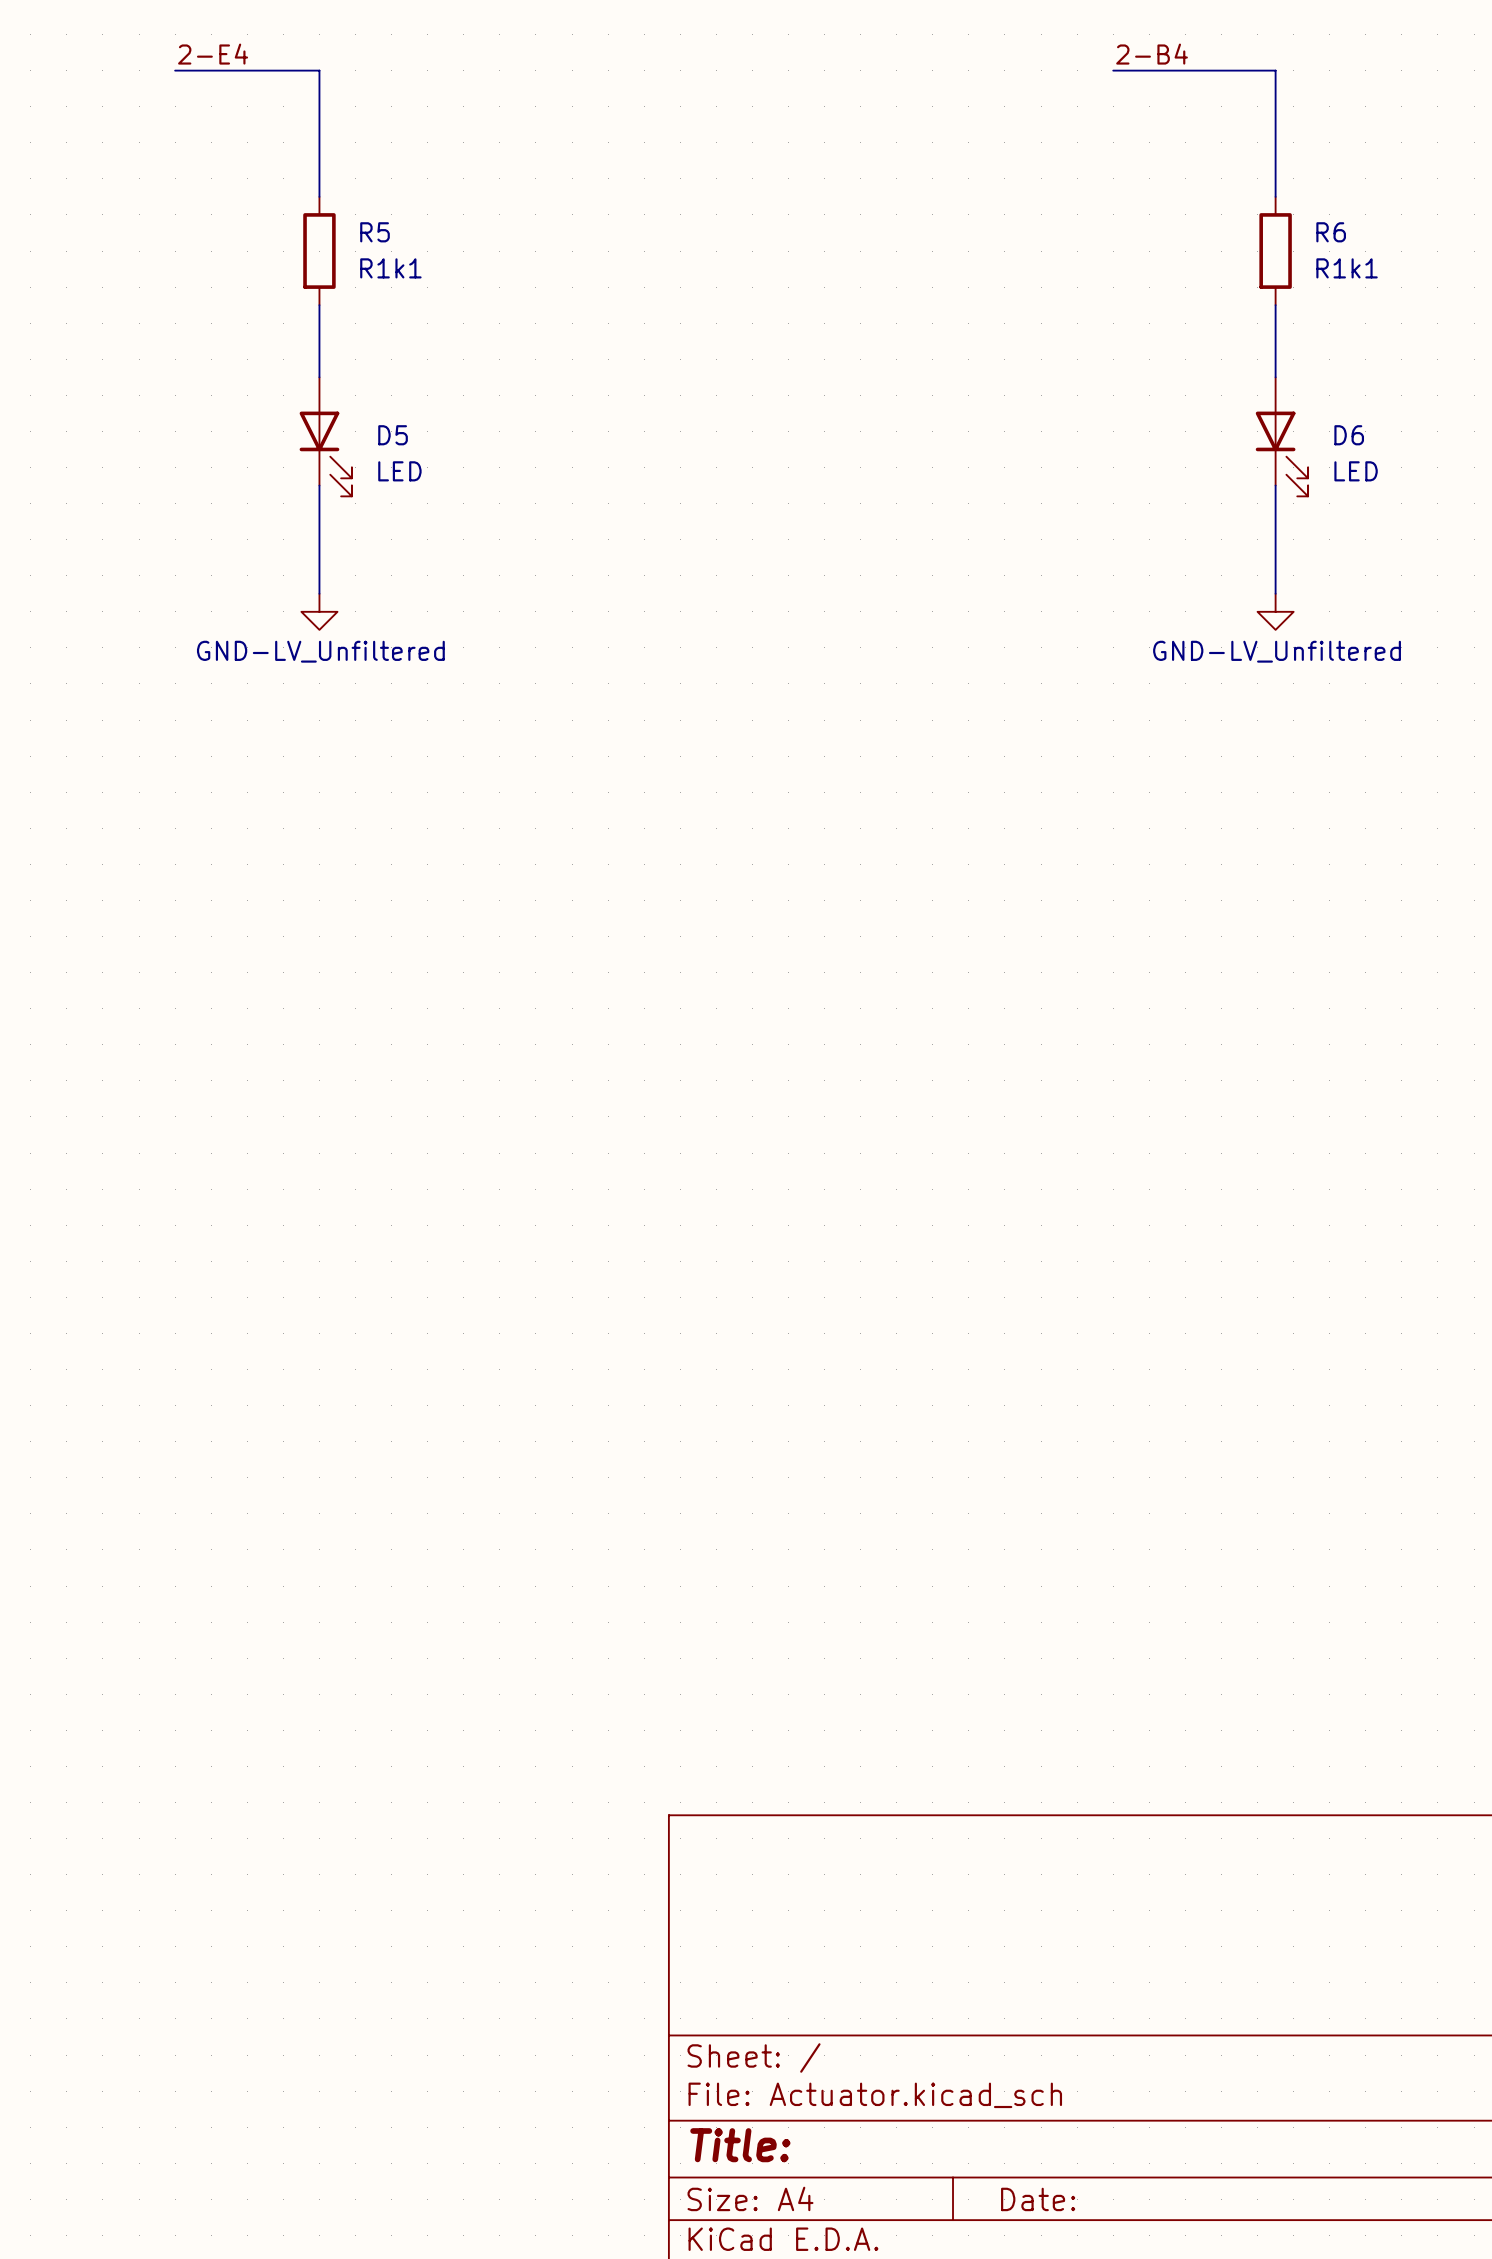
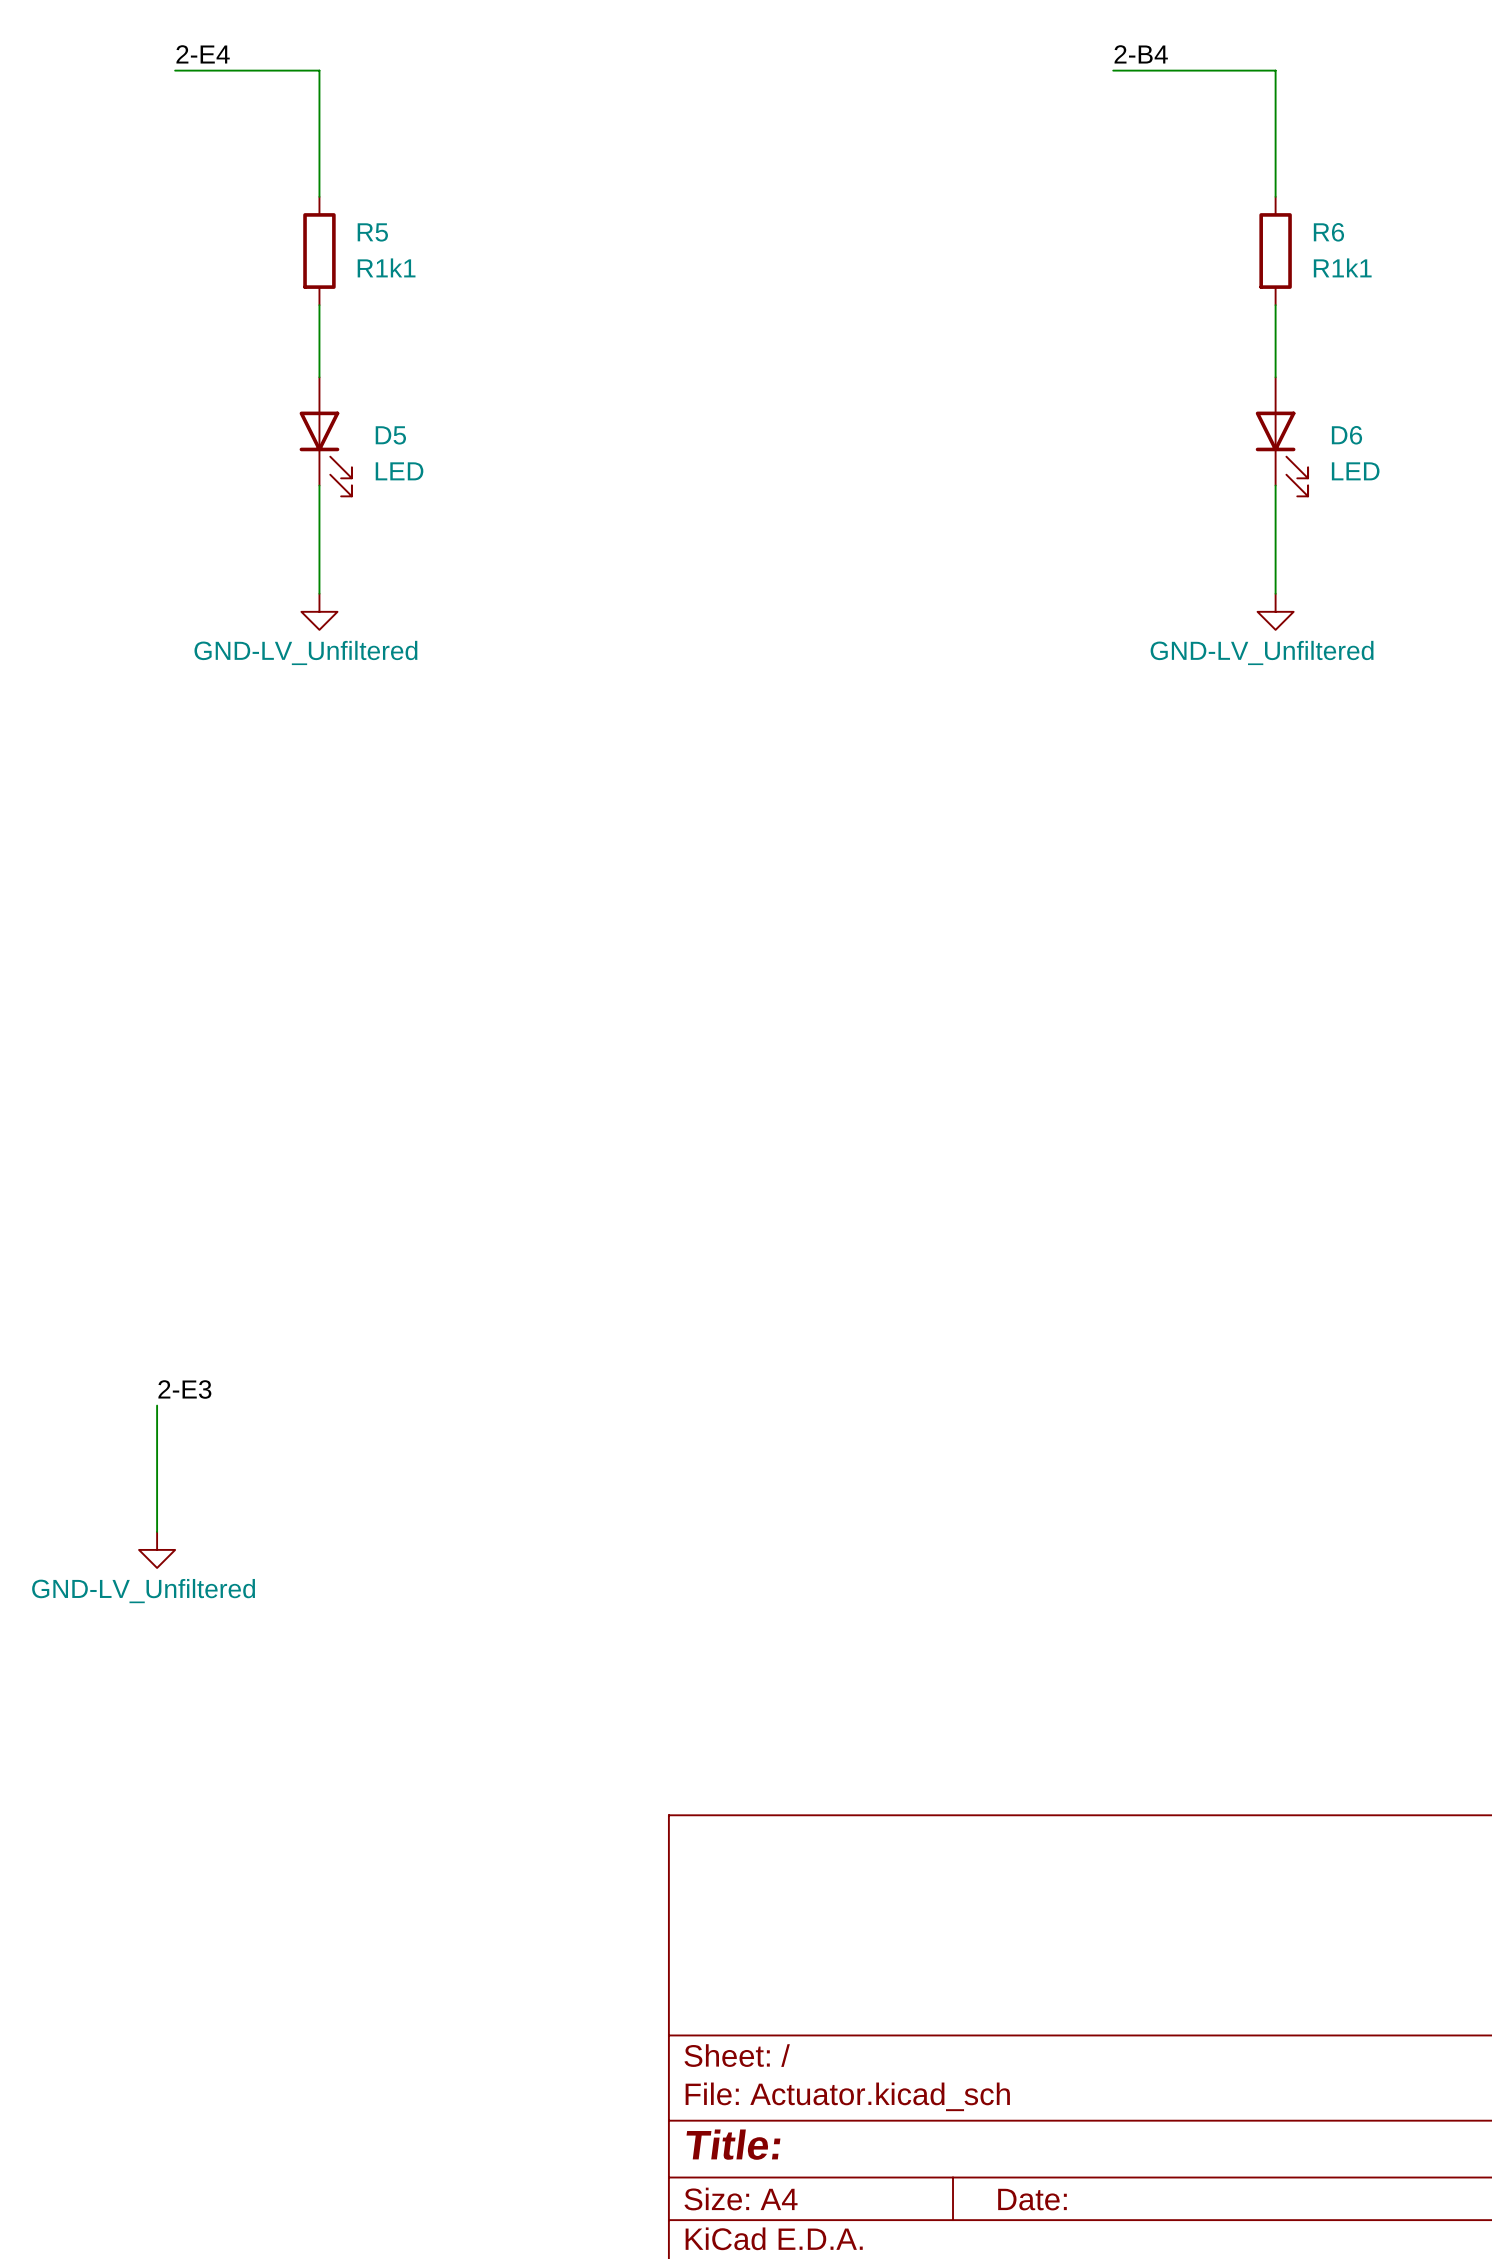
label: none -> 2-E3 (184, 1389)
wire: none -> (157, 1405) (157, 1531)
power symbol: none -> GND-LV_Unfiltered (157, 1549)

